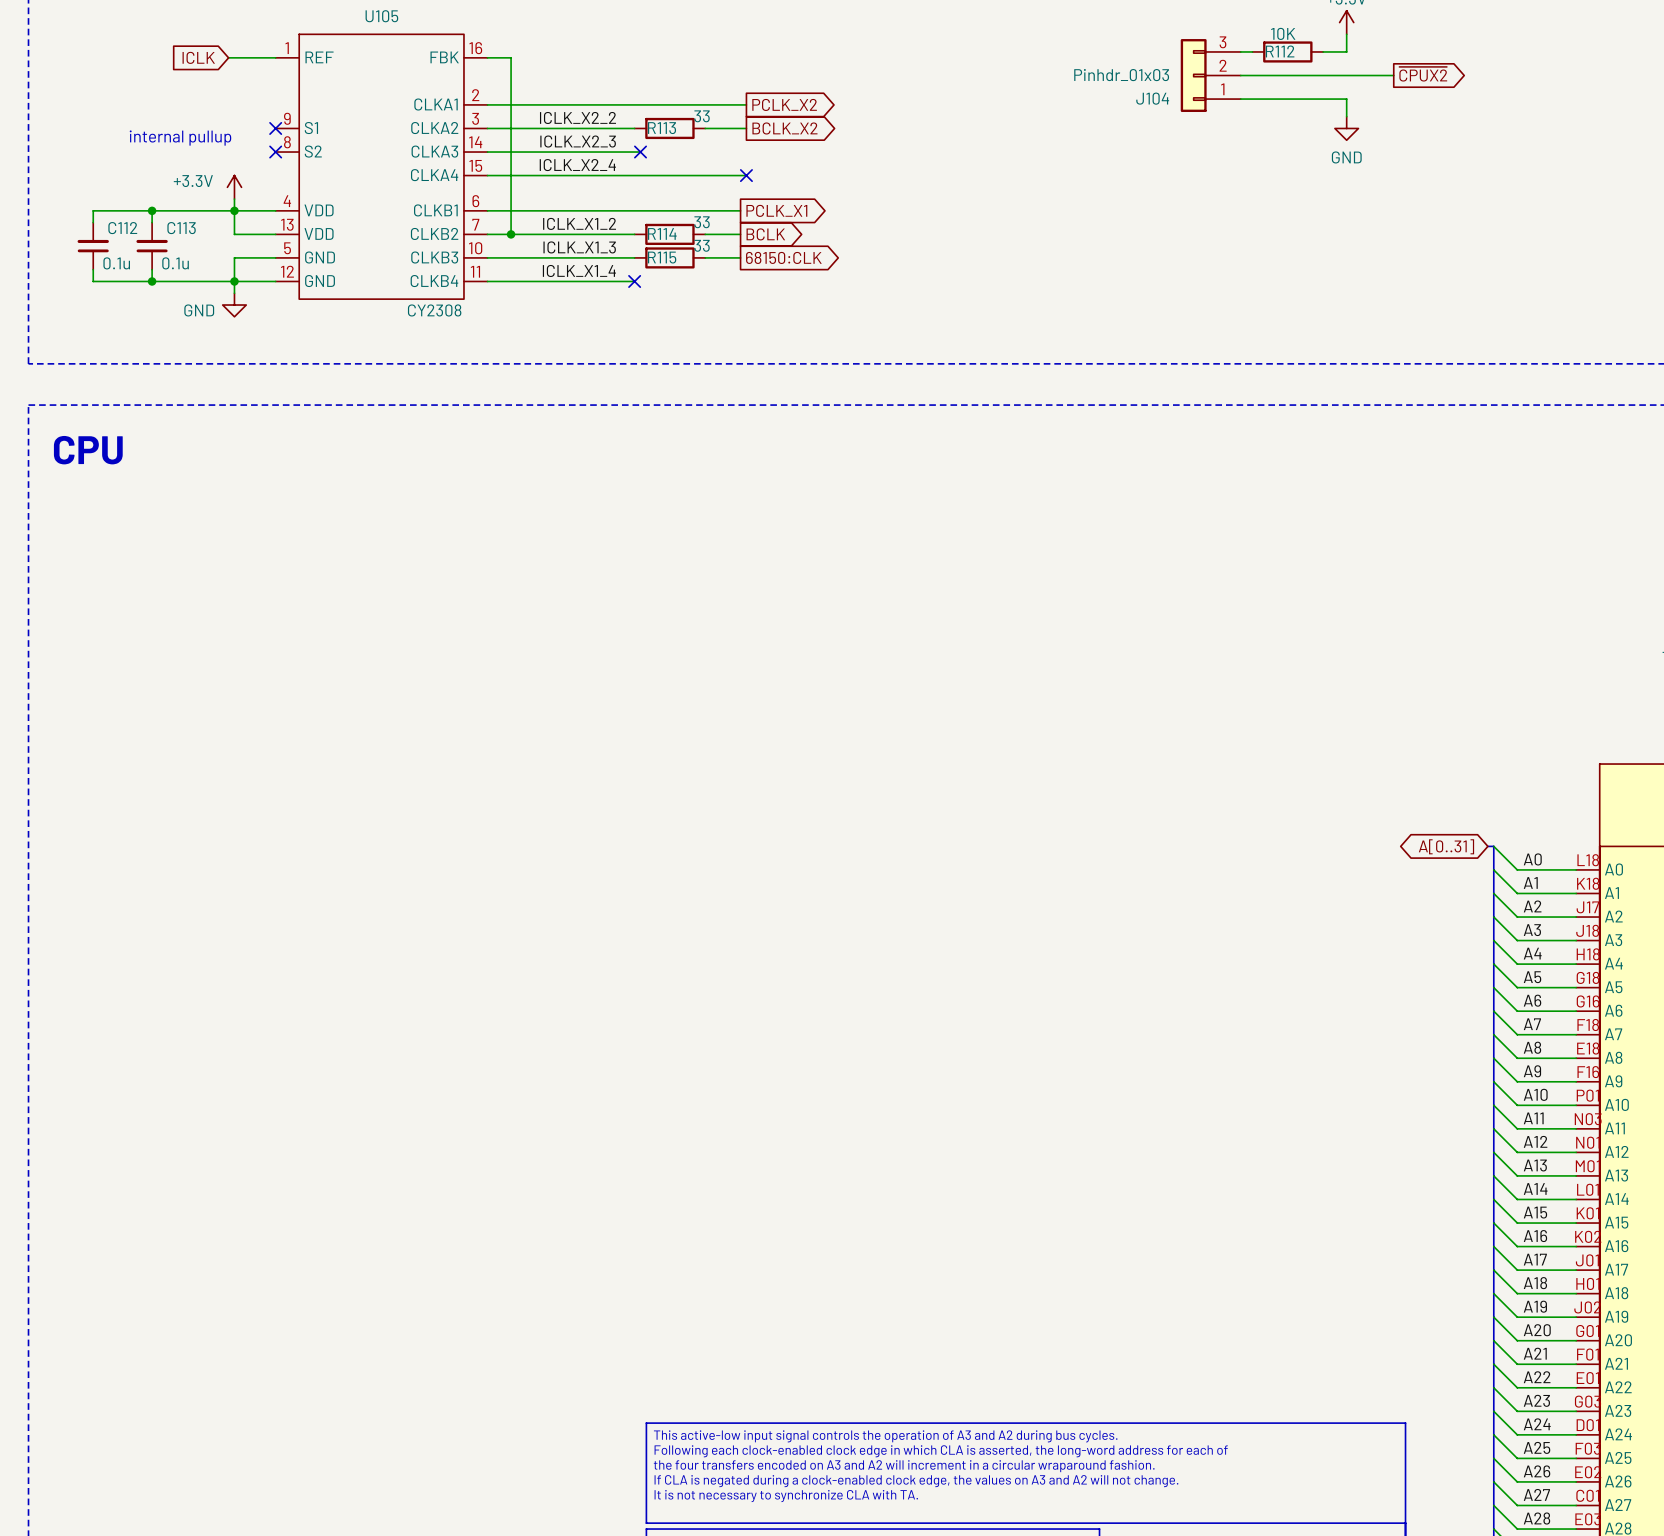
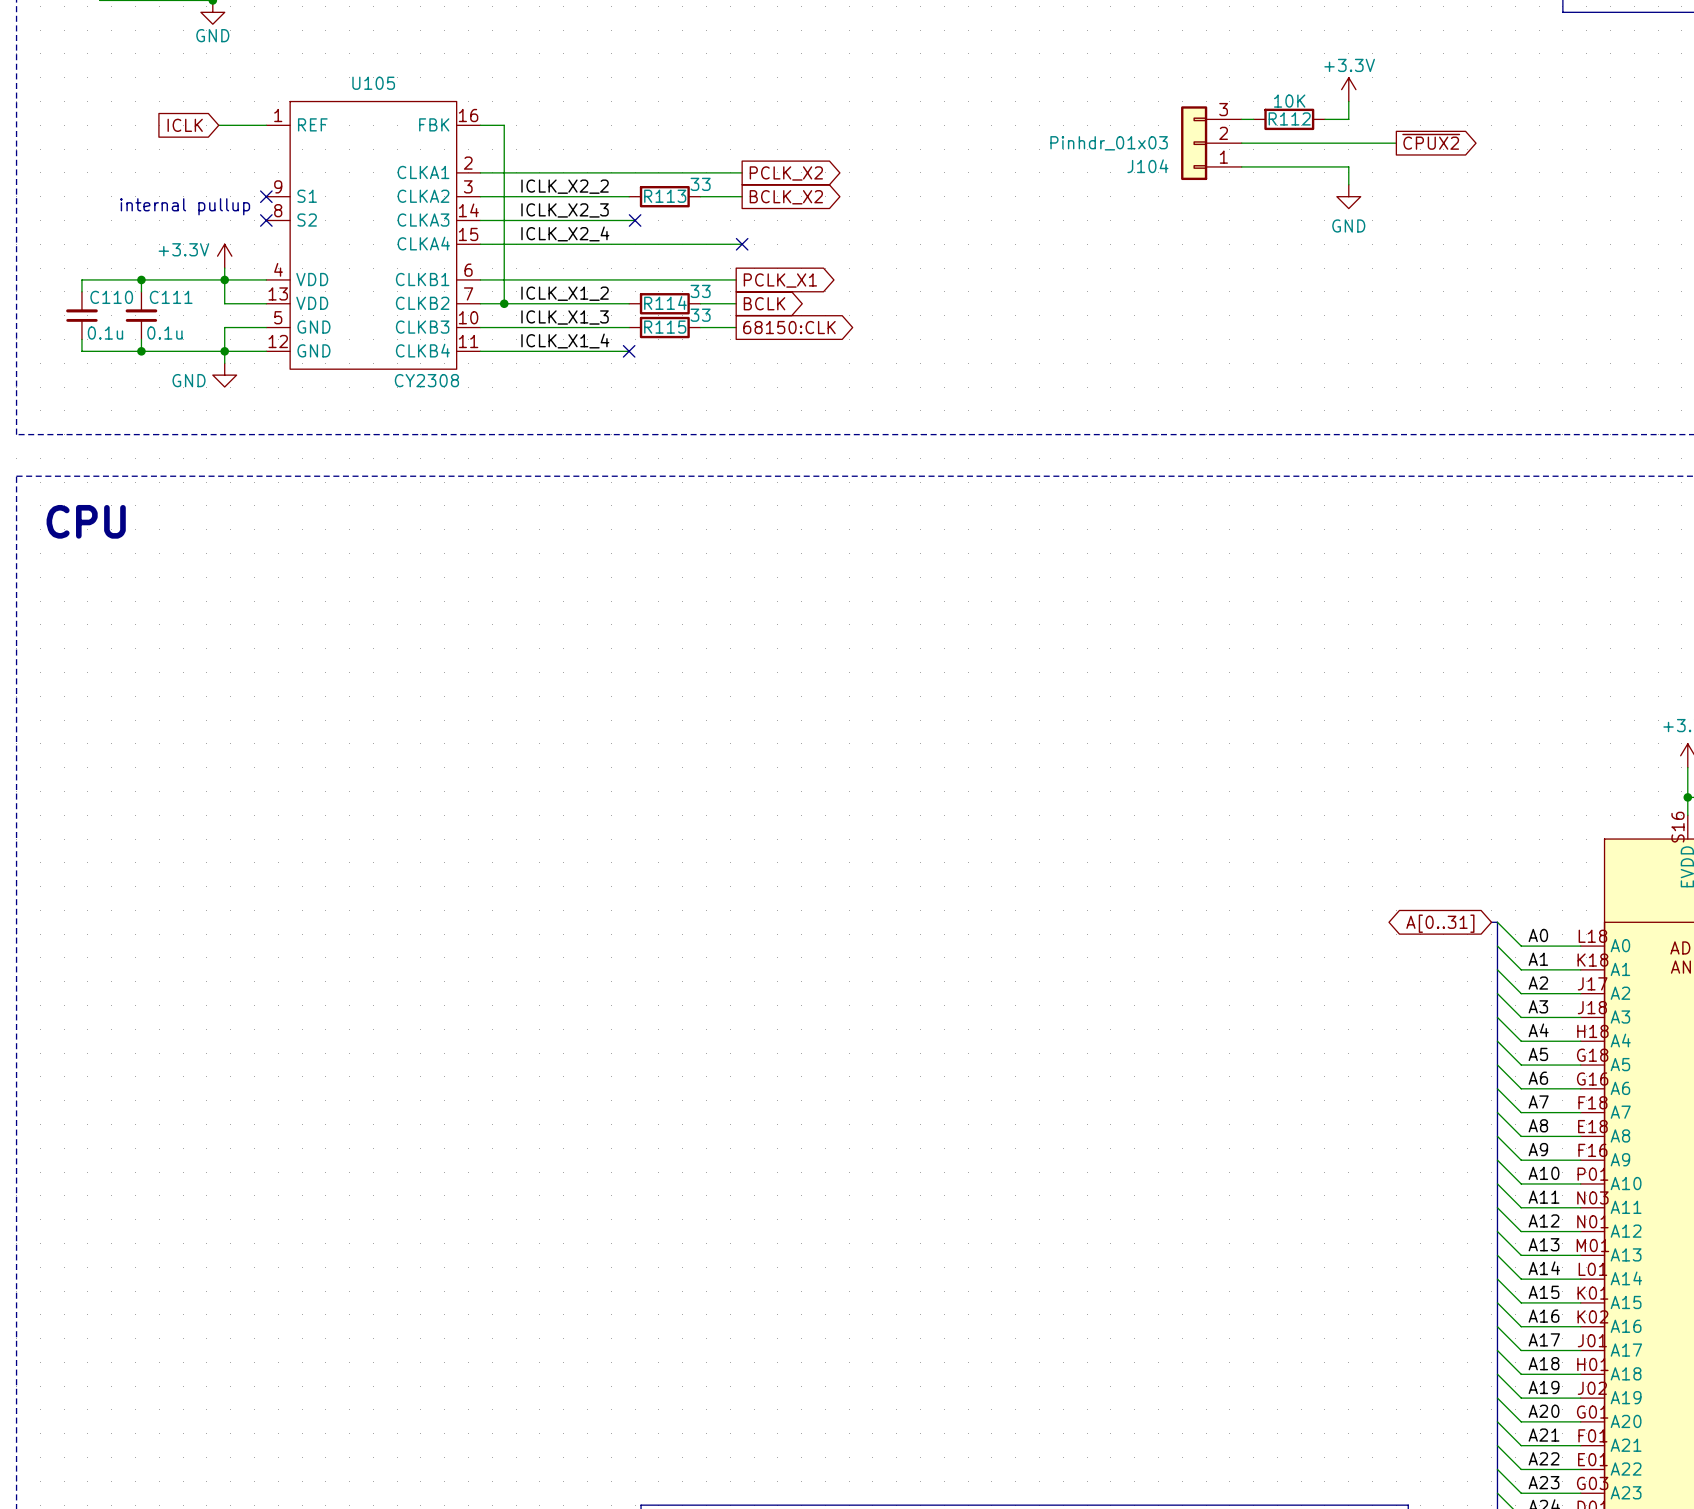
C112 name: C112 (122, 228) -> C110 (111, 297)
C113 name: C113 (181, 228) -> C111 (171, 297)

